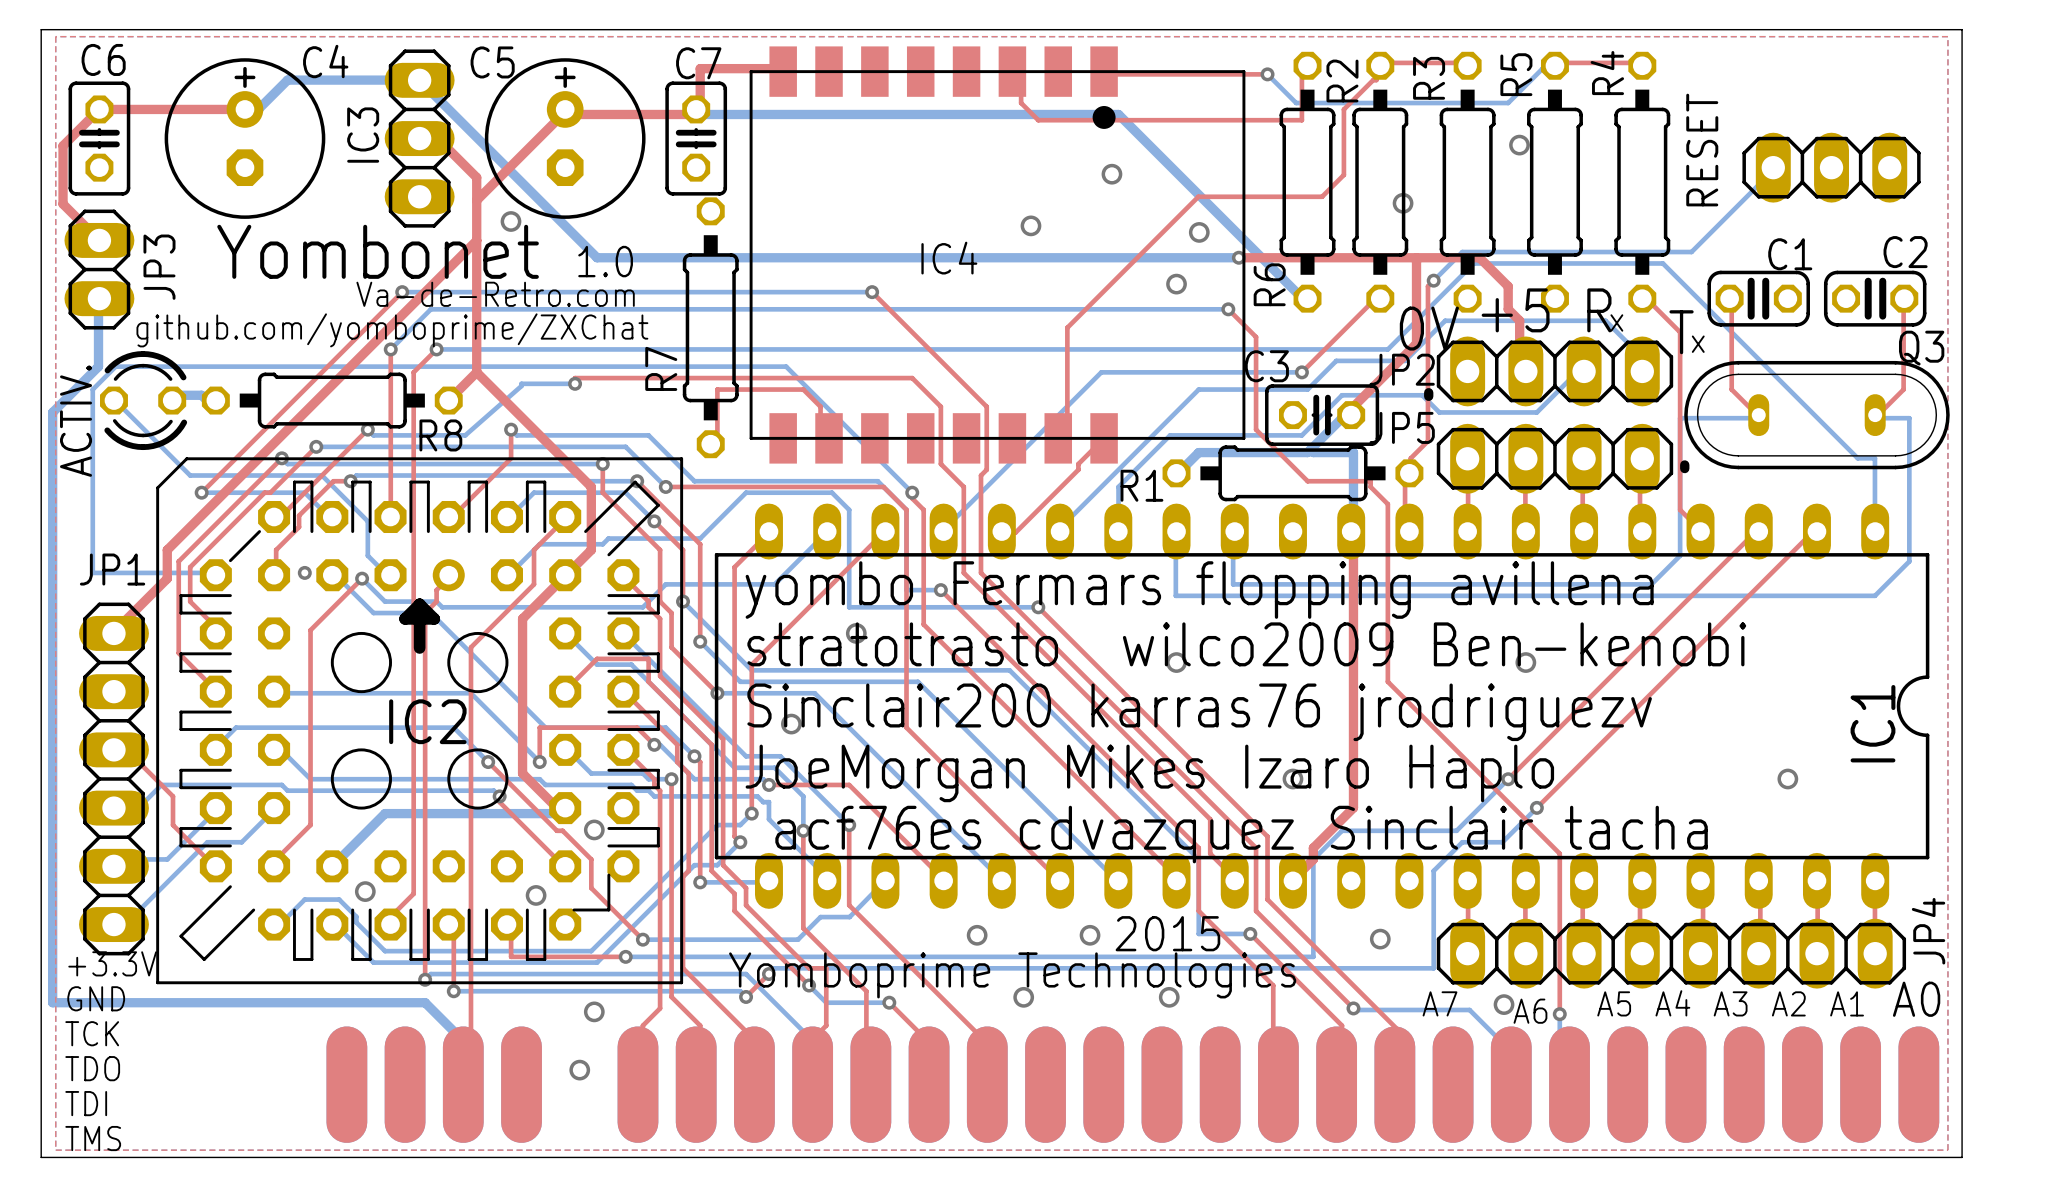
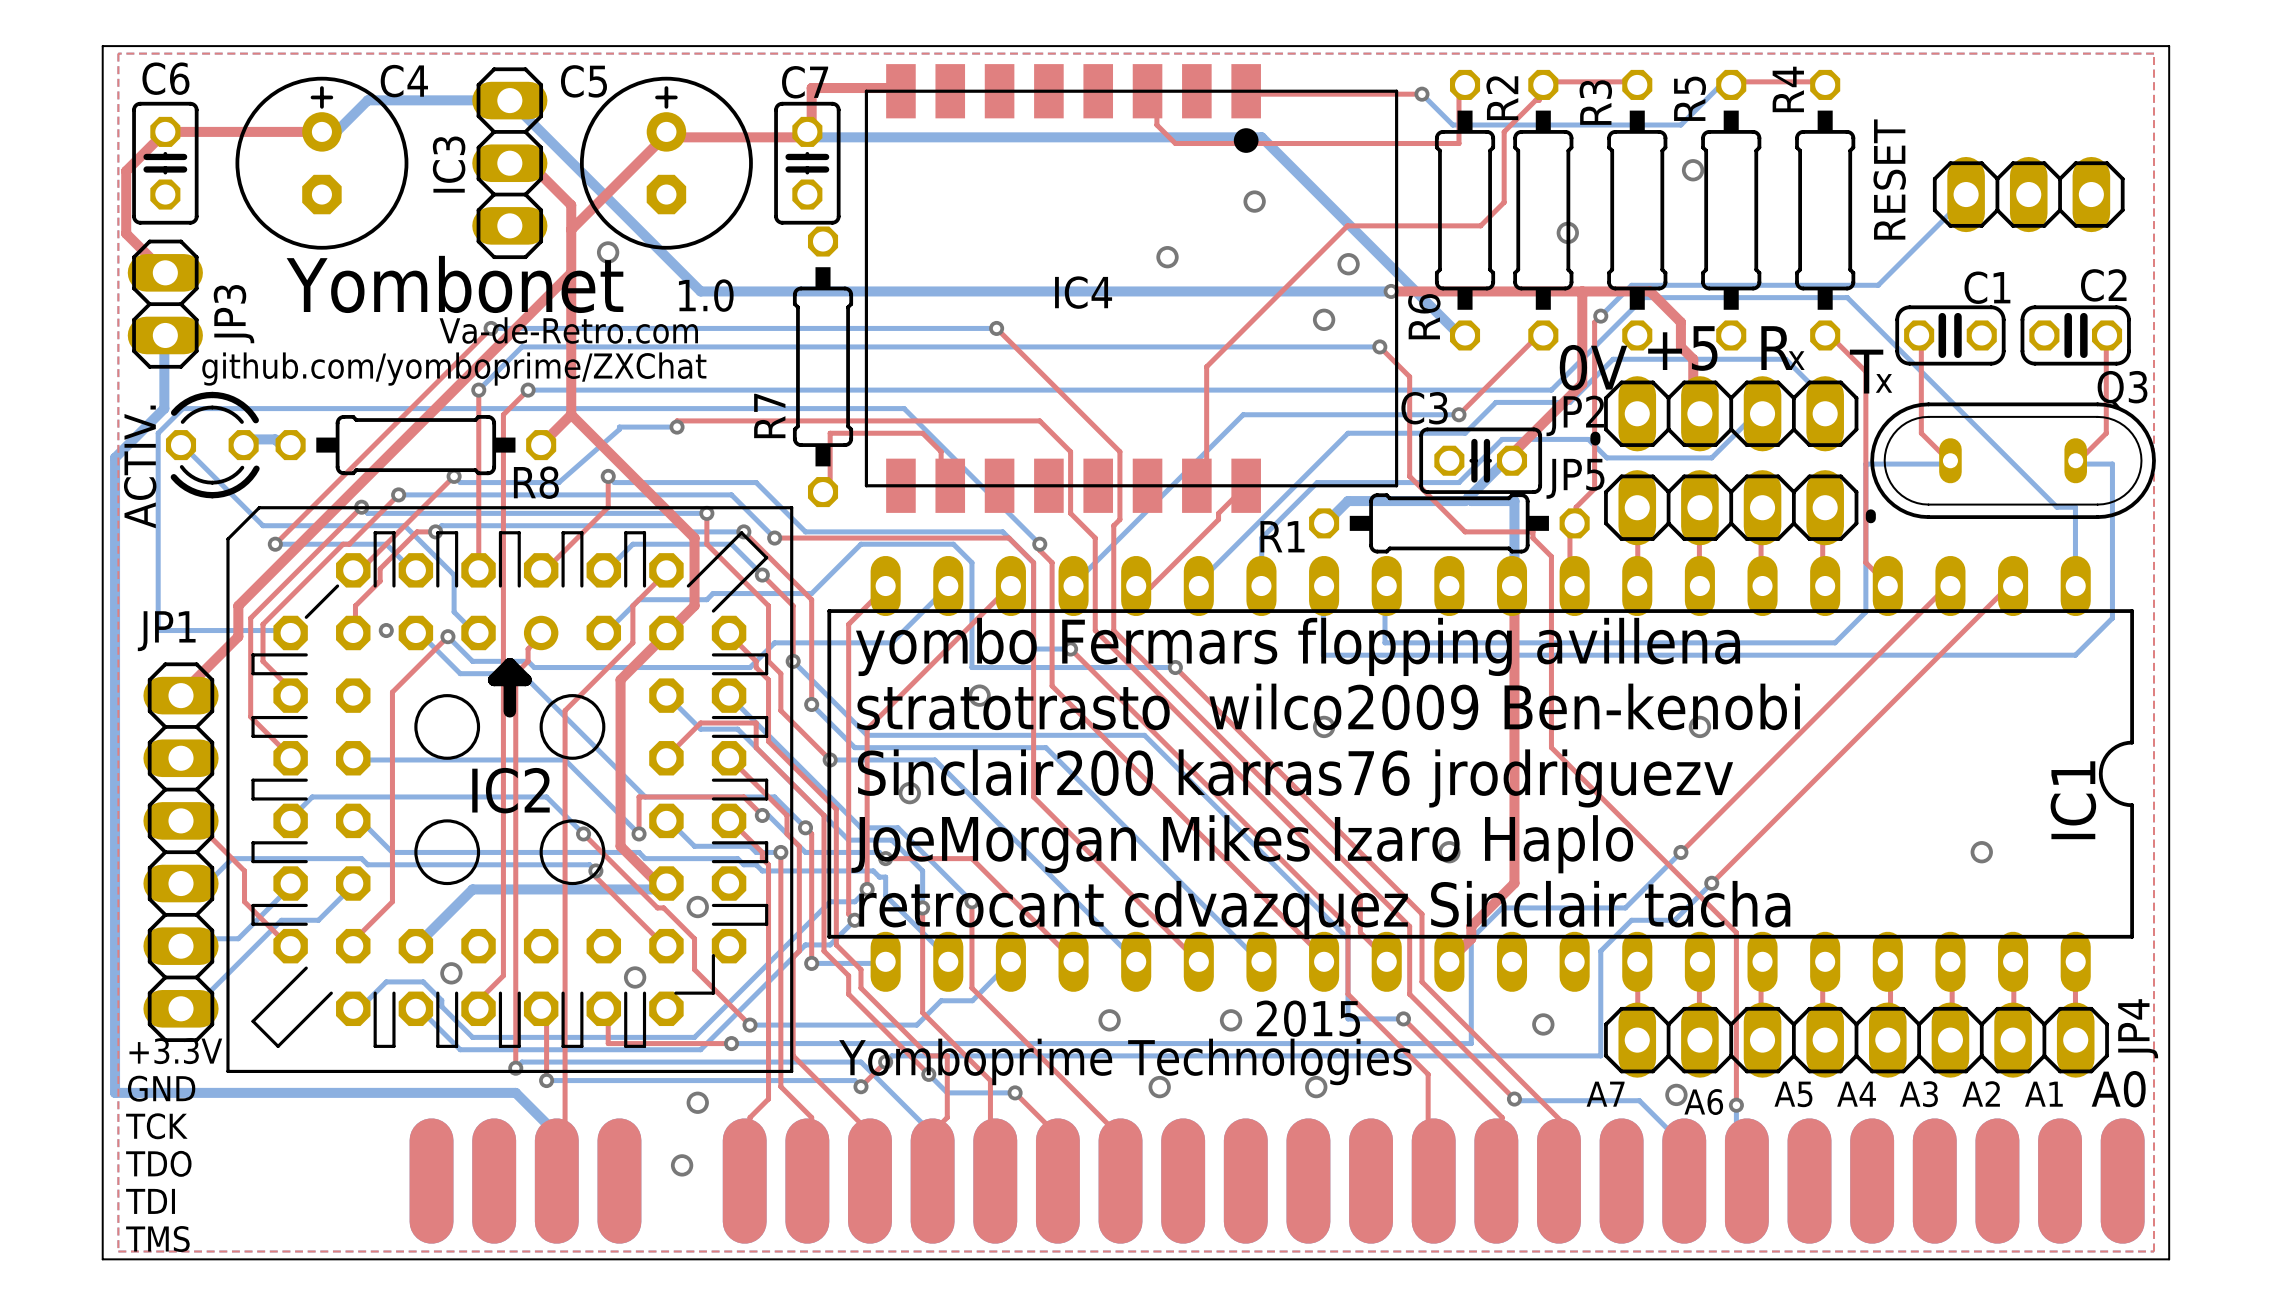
text: acf76es cdvazquez Sinclair tacha (1241, 834) -> retrocant cdvazquez Sinclair tacha (1324, 910)

